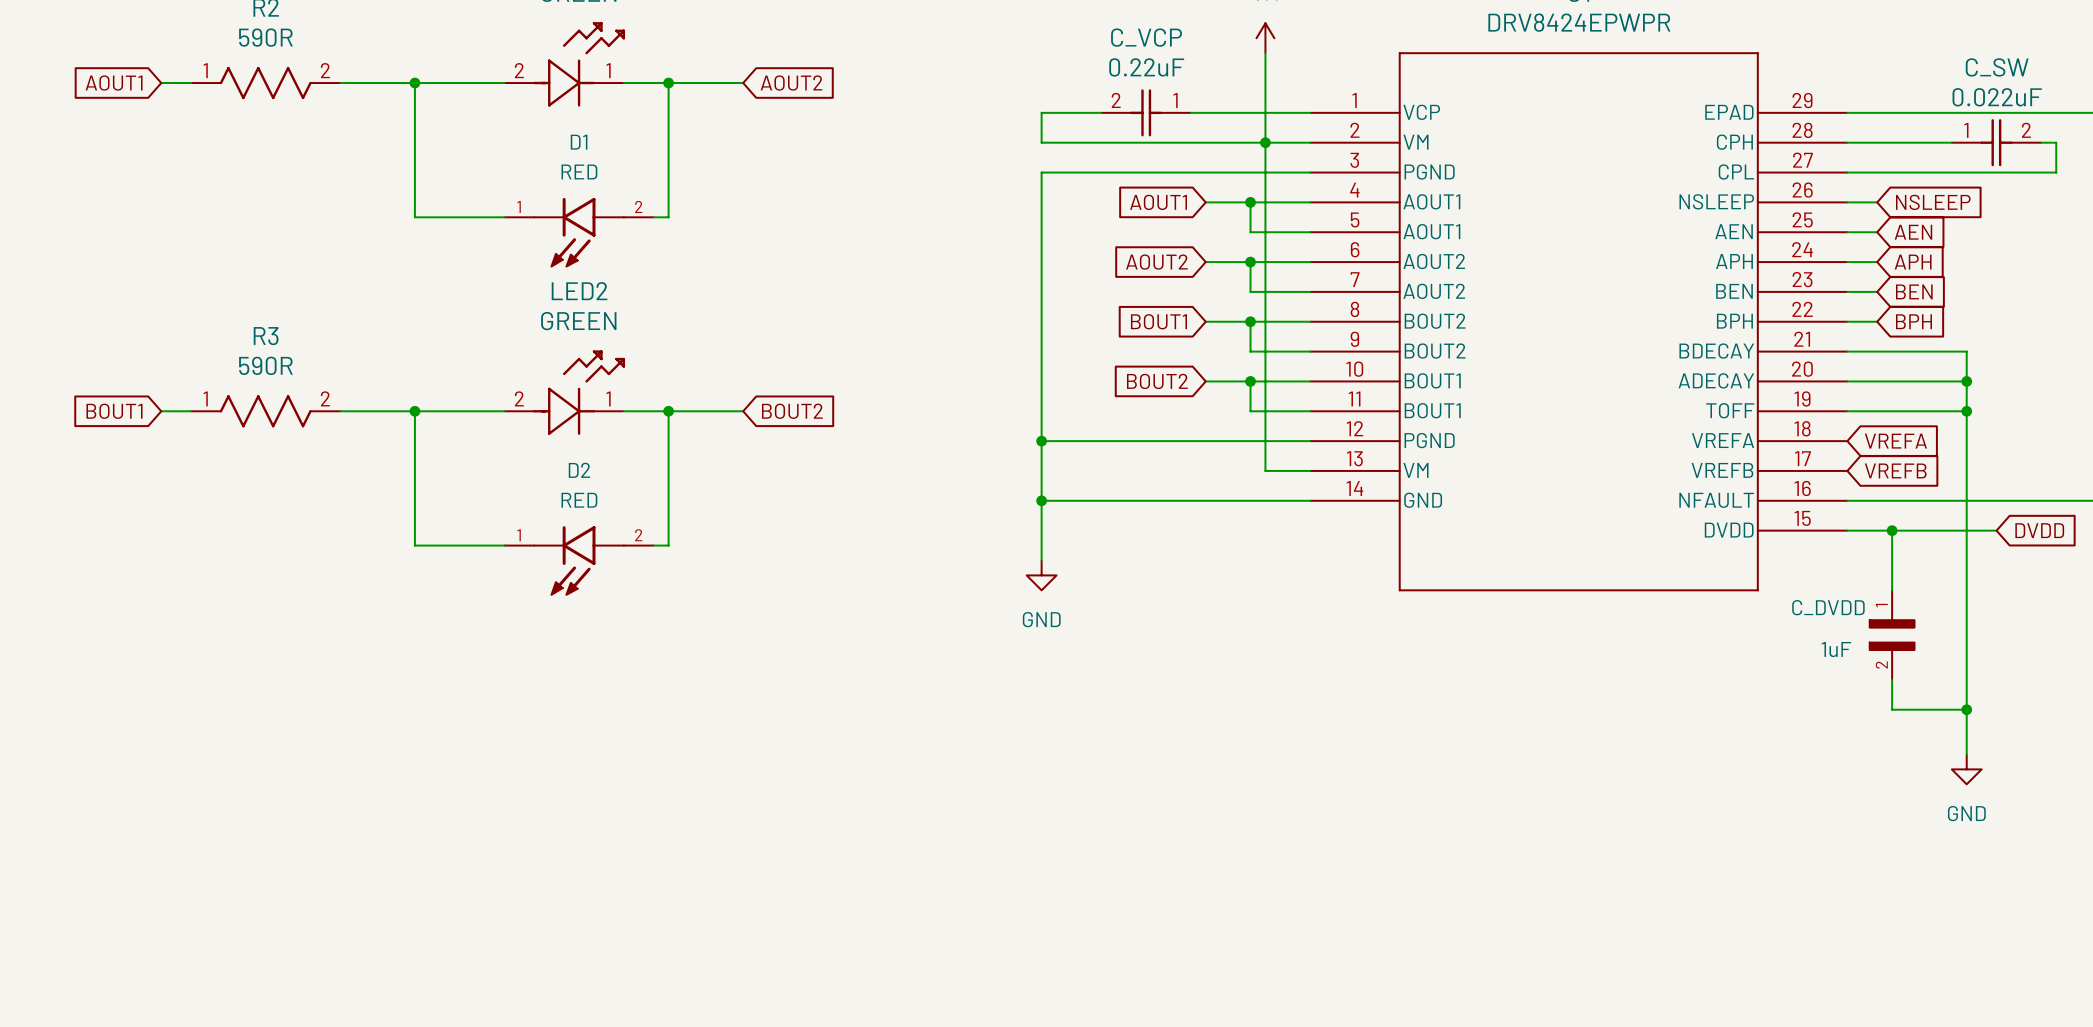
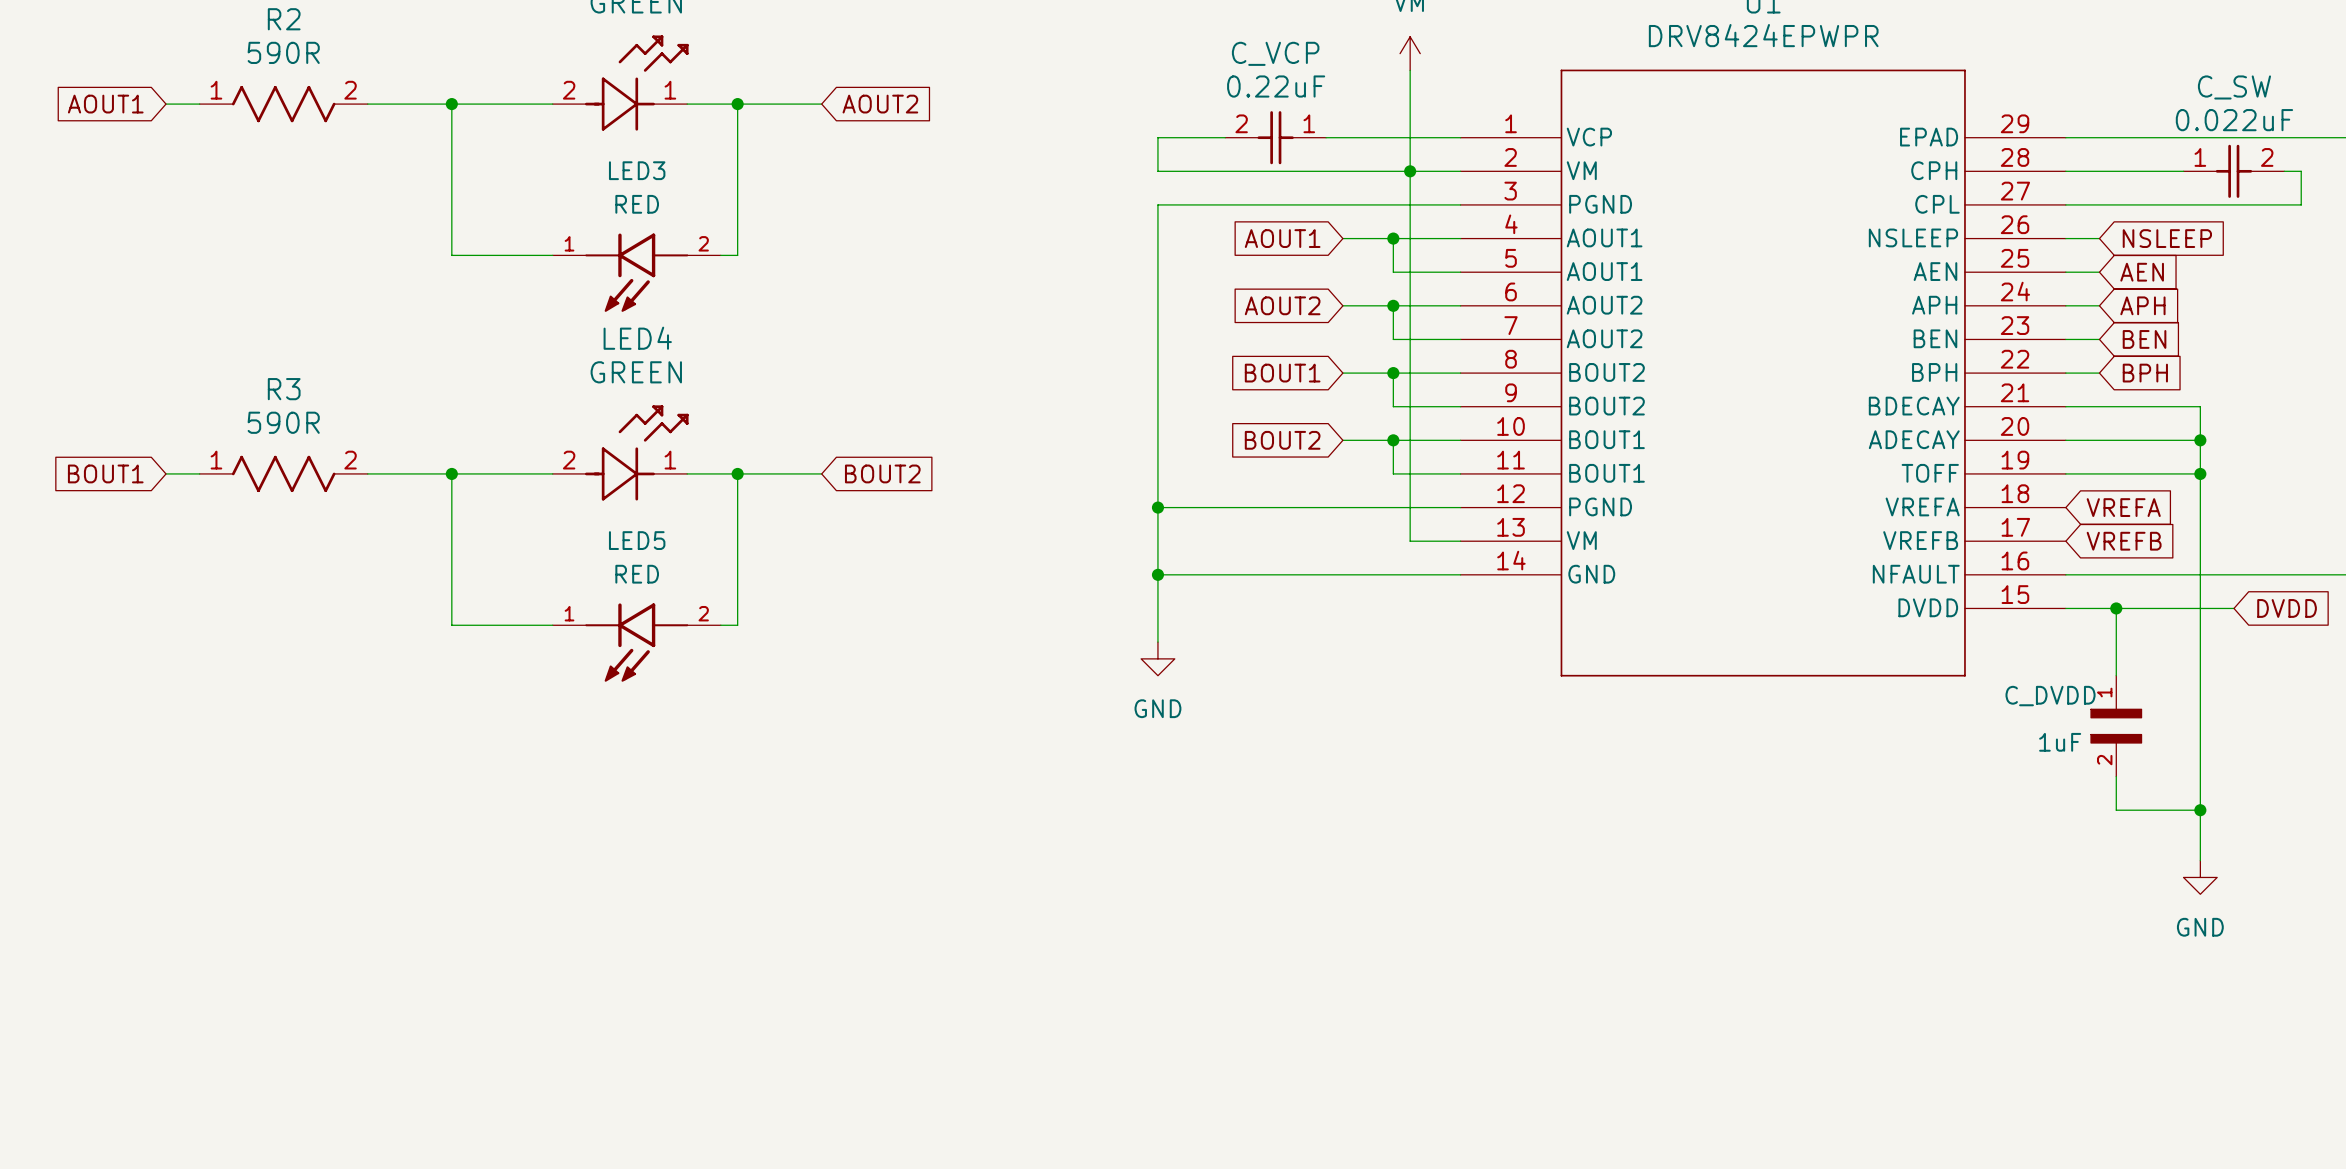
D1 name: D1 (579, 142) -> LED3 (637, 170)
LED2 name: LED2 (579, 291) -> LED4 (637, 338)
D2 name: D2 (579, 470) -> LED5 (637, 540)

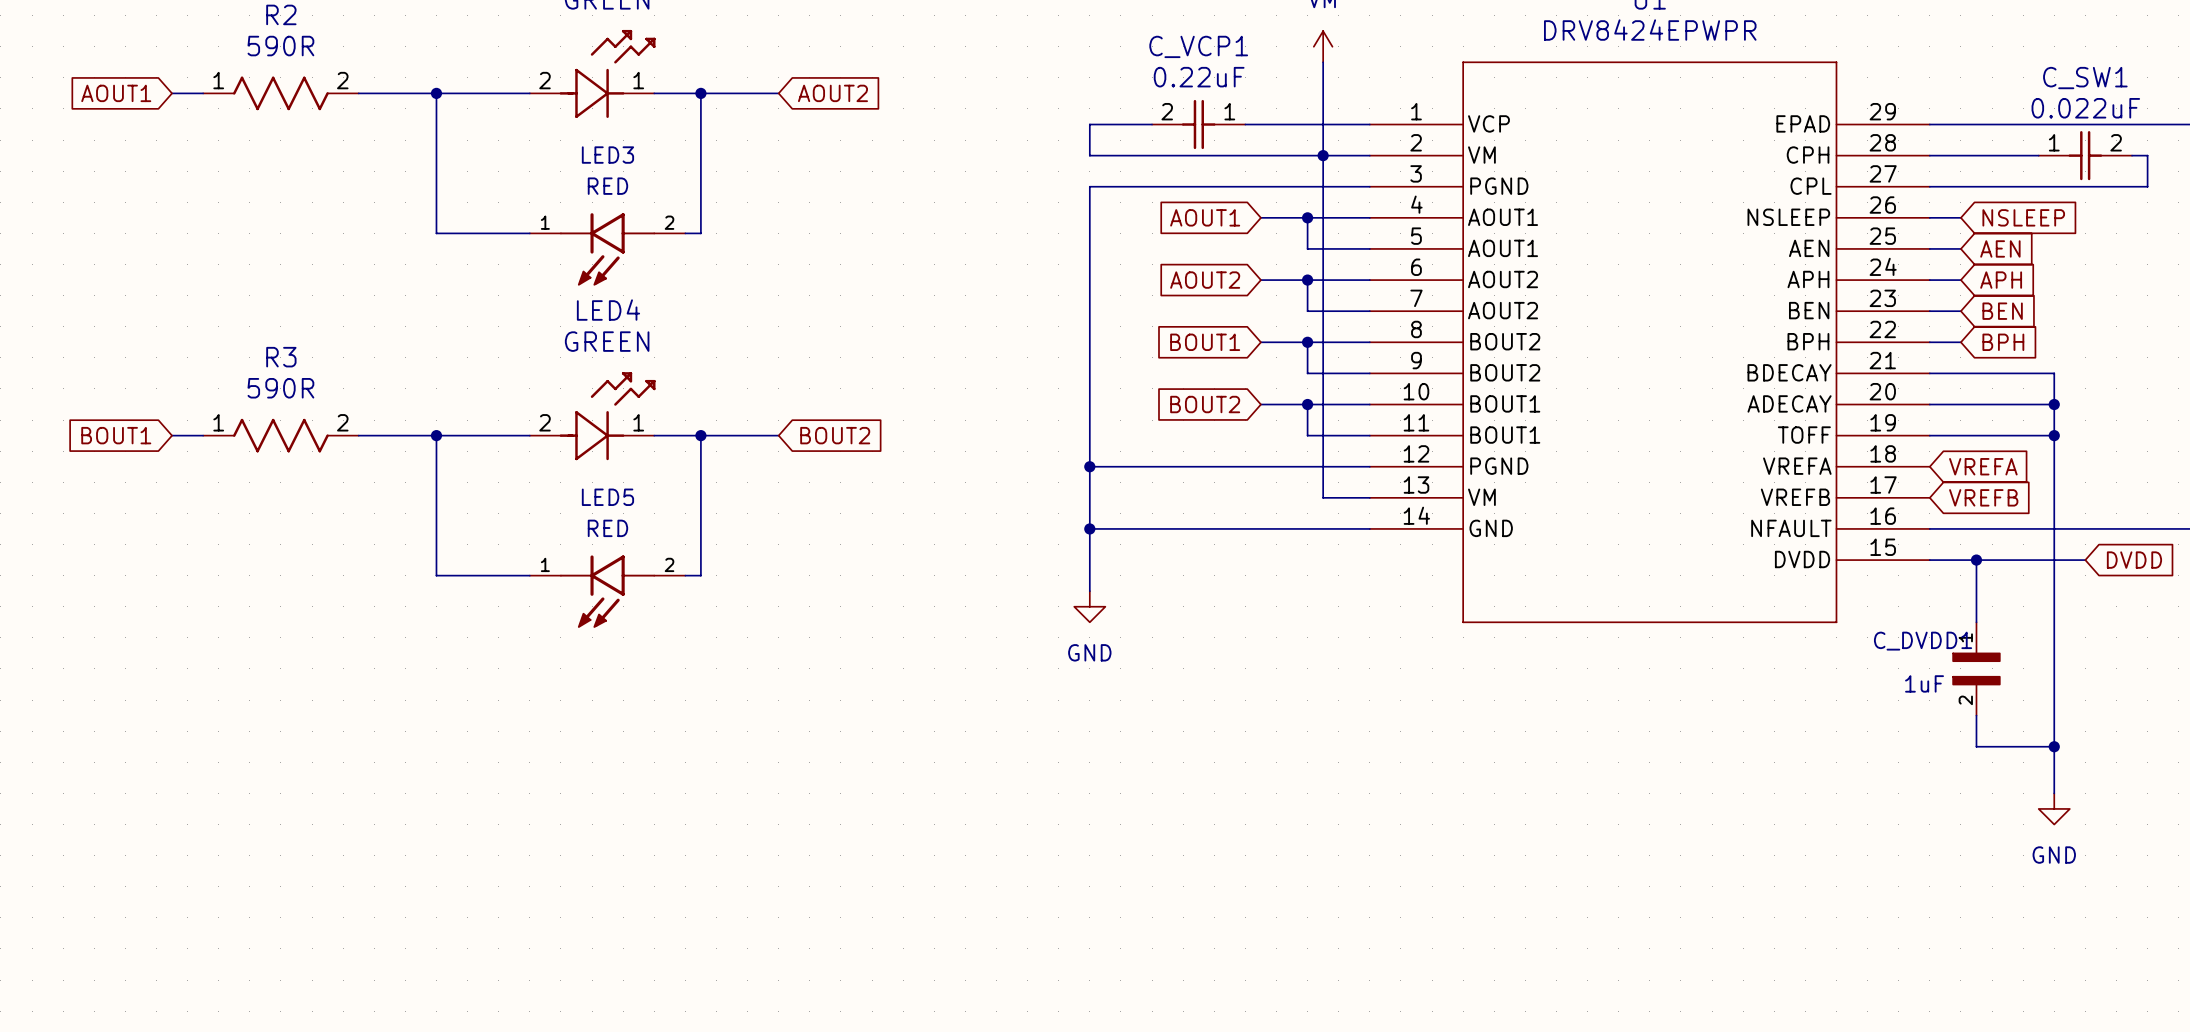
C_VCP name: C_VCP (1275, 53) -> C_VCP1 (1198, 46)
C_SW name: C_SW (2234, 87) -> C_SW1 (2085, 78)
C_DVDD name: C_DVDD (2050, 696) -> C_DVDD1 (1923, 641)

